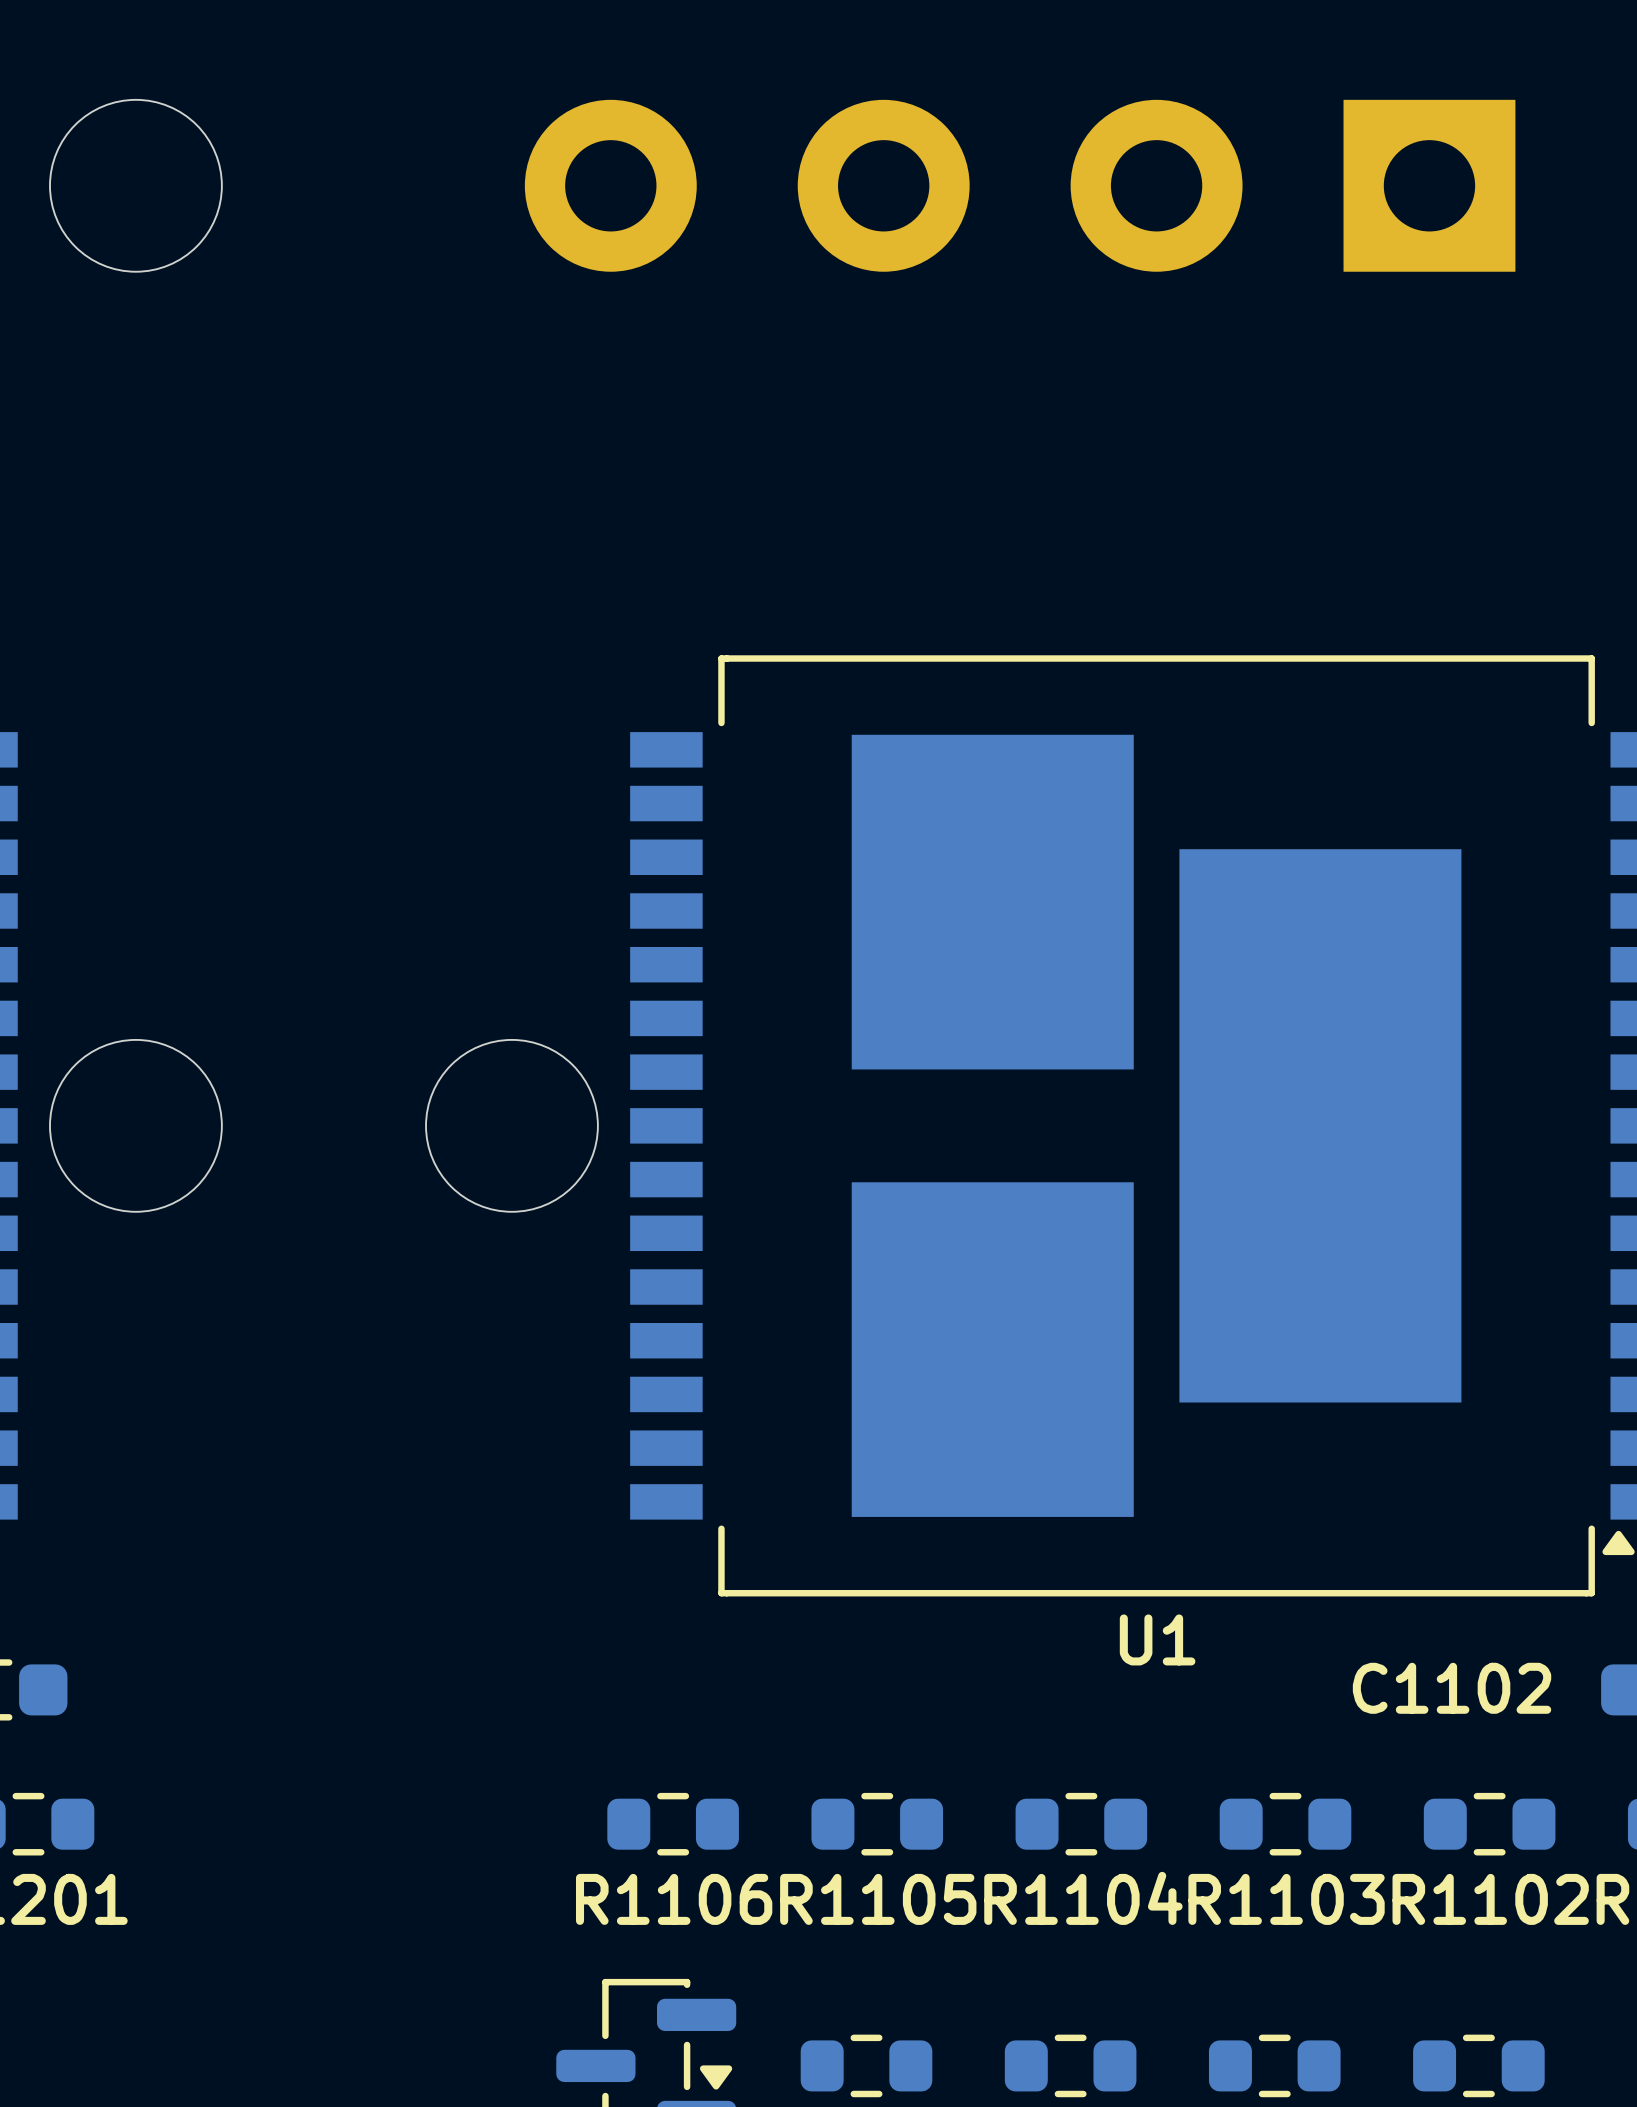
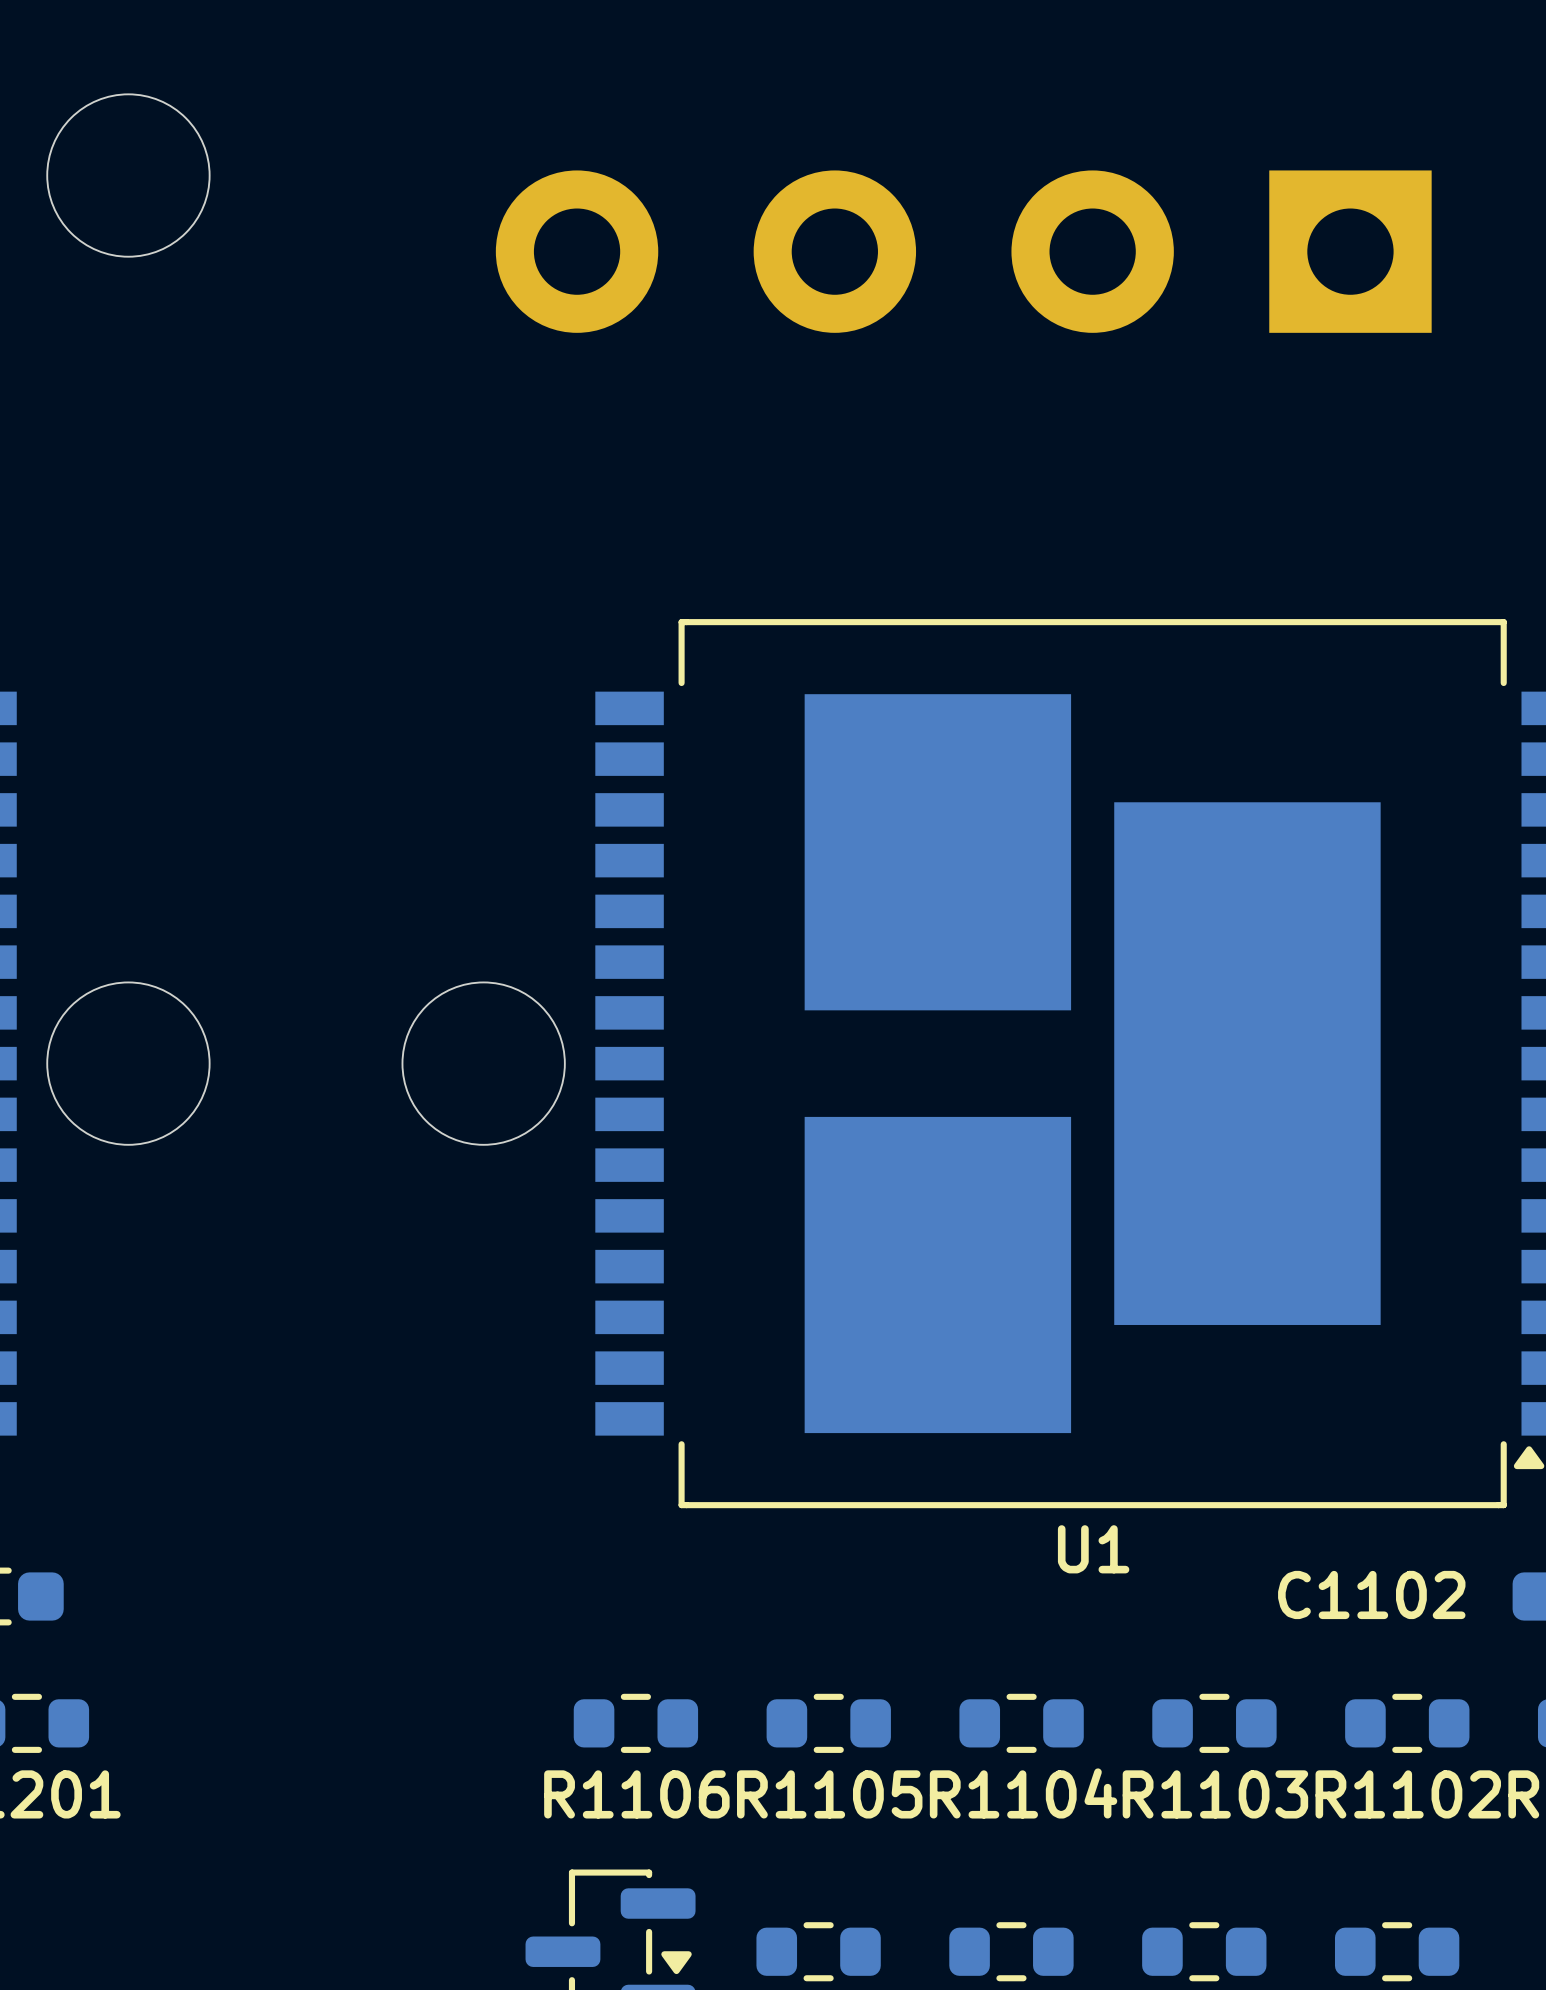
part position: (1020, 185) -> (963, 251)

